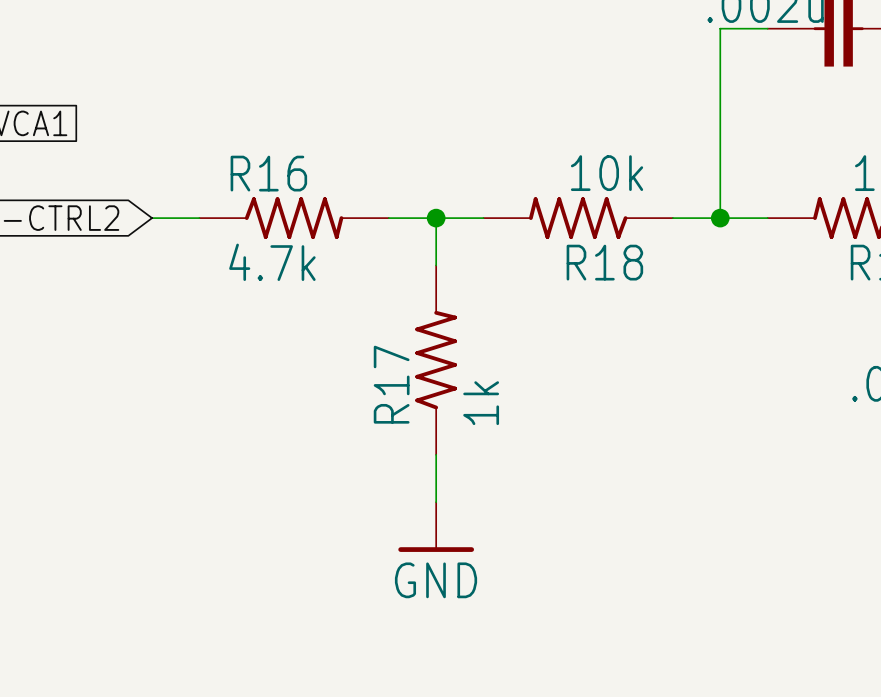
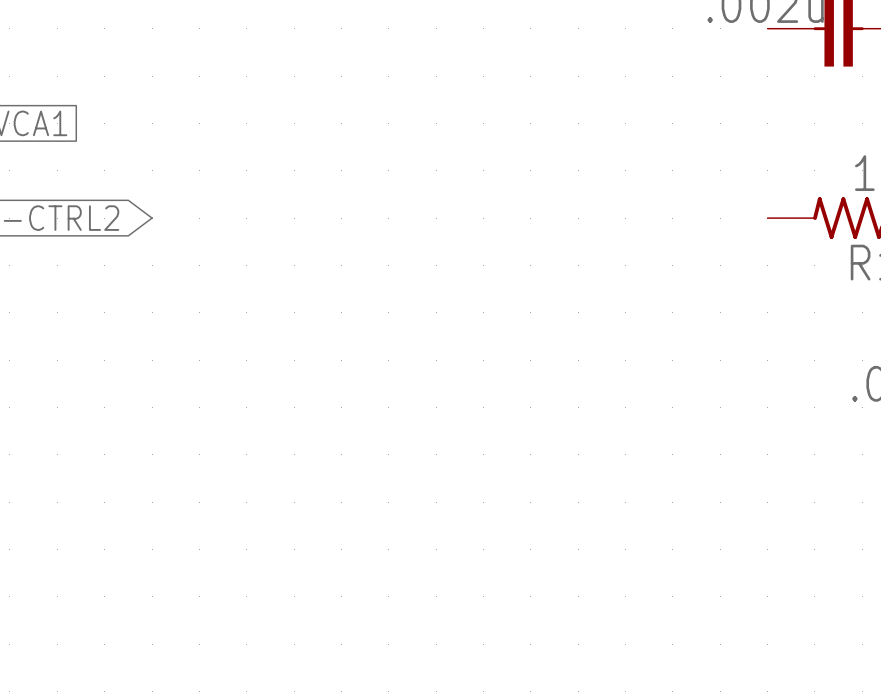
wire: (767, 28) (720, 28) (720, 218) -> none
wire: (152, 218) (199, 218) -> none
R16: 4.7k (294, 218) -> none
wire: (388, 218) (483, 218) -> none
wire: (436, 218) (436, 265) -> none
junction: (436, 218) -> none
R18: 10k (578, 218) -> none
wire: (672, 218) (767, 218) -> none
junction: (720, 218) -> none
R17: 1k (436, 360) -> none
wire: (436, 454) (436, 502) -> none
power symbol: GND (436, 527) -> none

